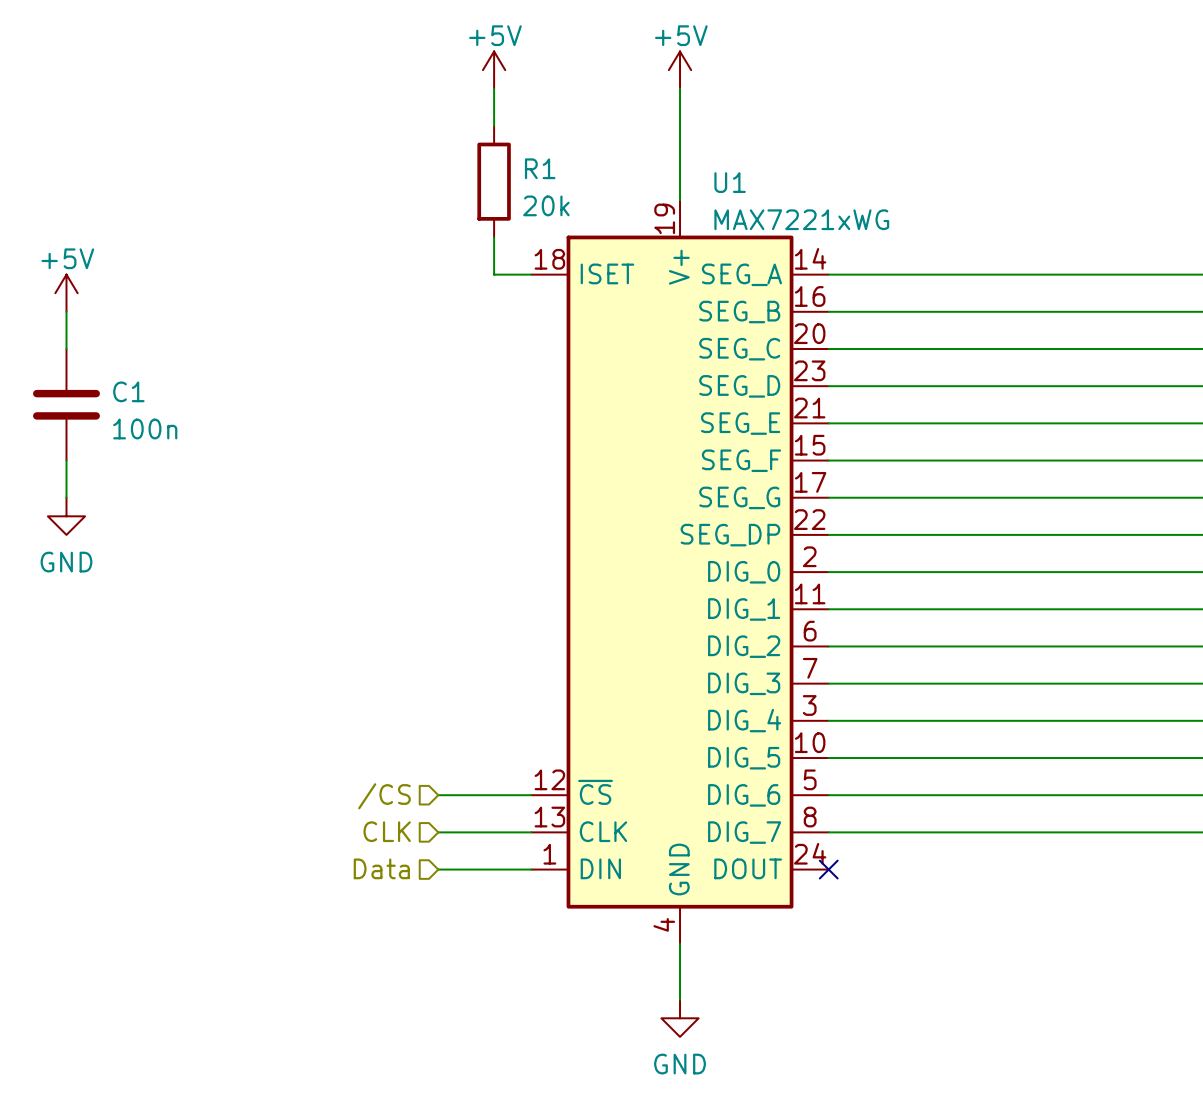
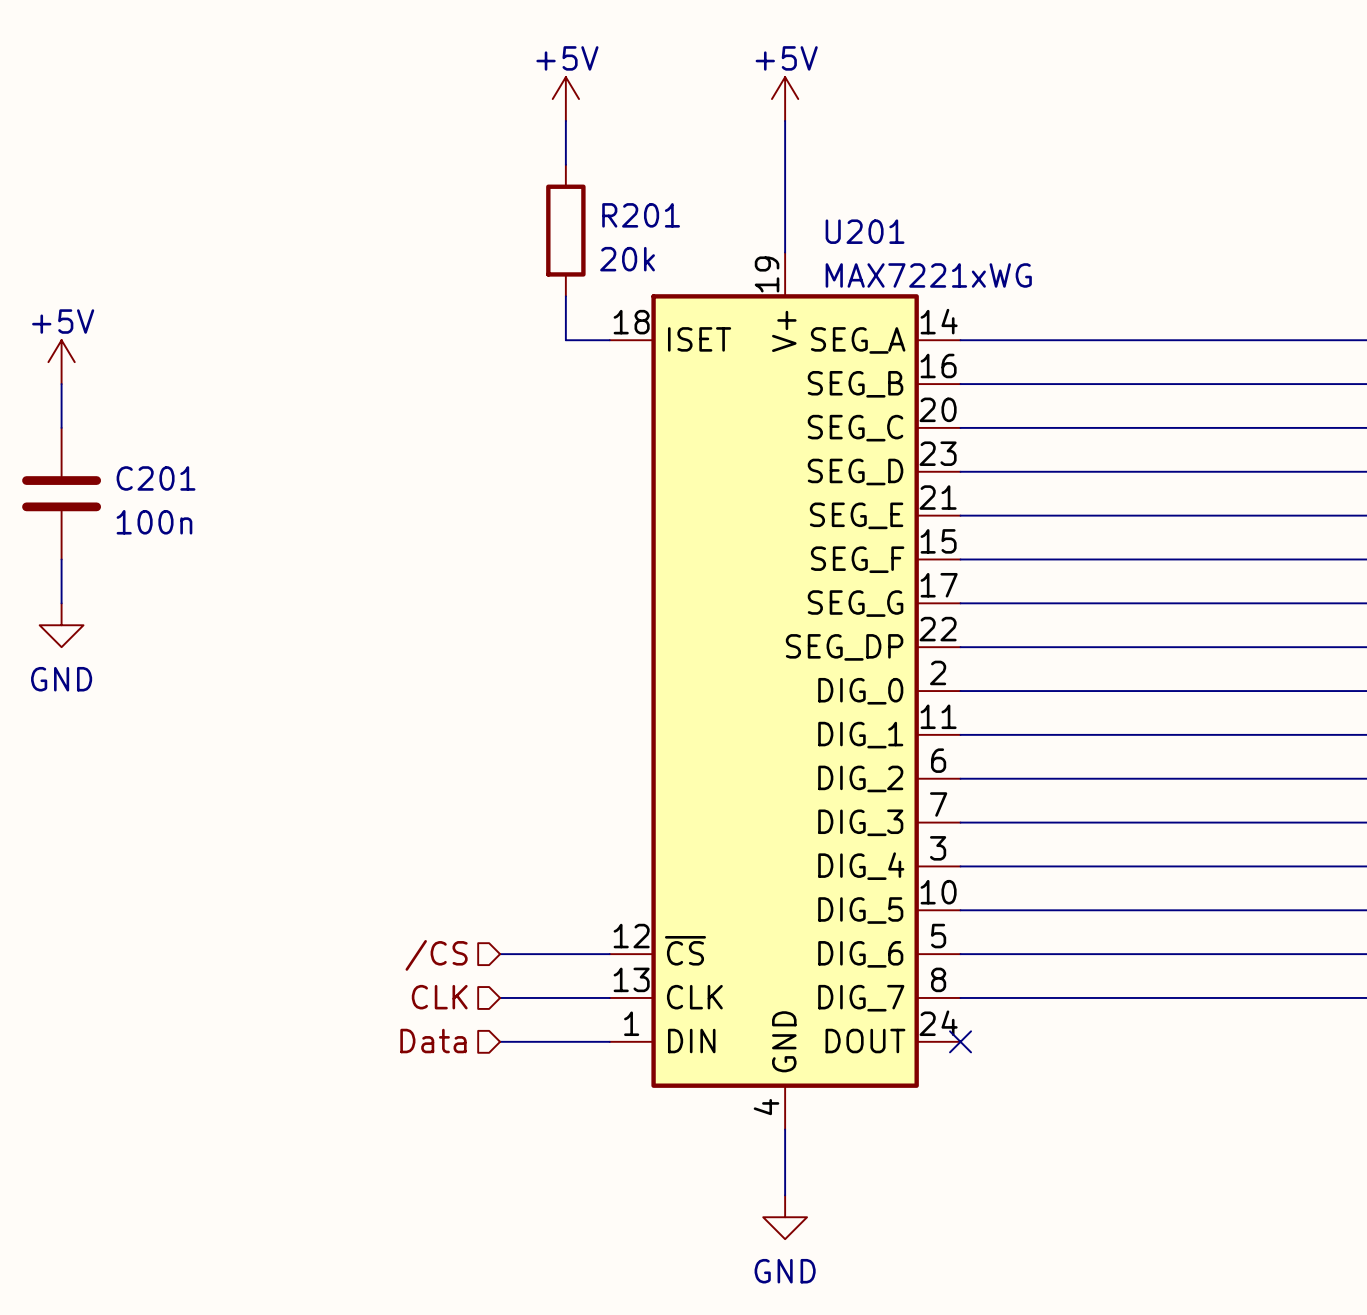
R1 name: R1 (540, 168) -> R201 (641, 215)
U1 name: U1 (730, 182) -> U201 (865, 231)
C1 name: C1 (128, 391) -> C201 (156, 478)

